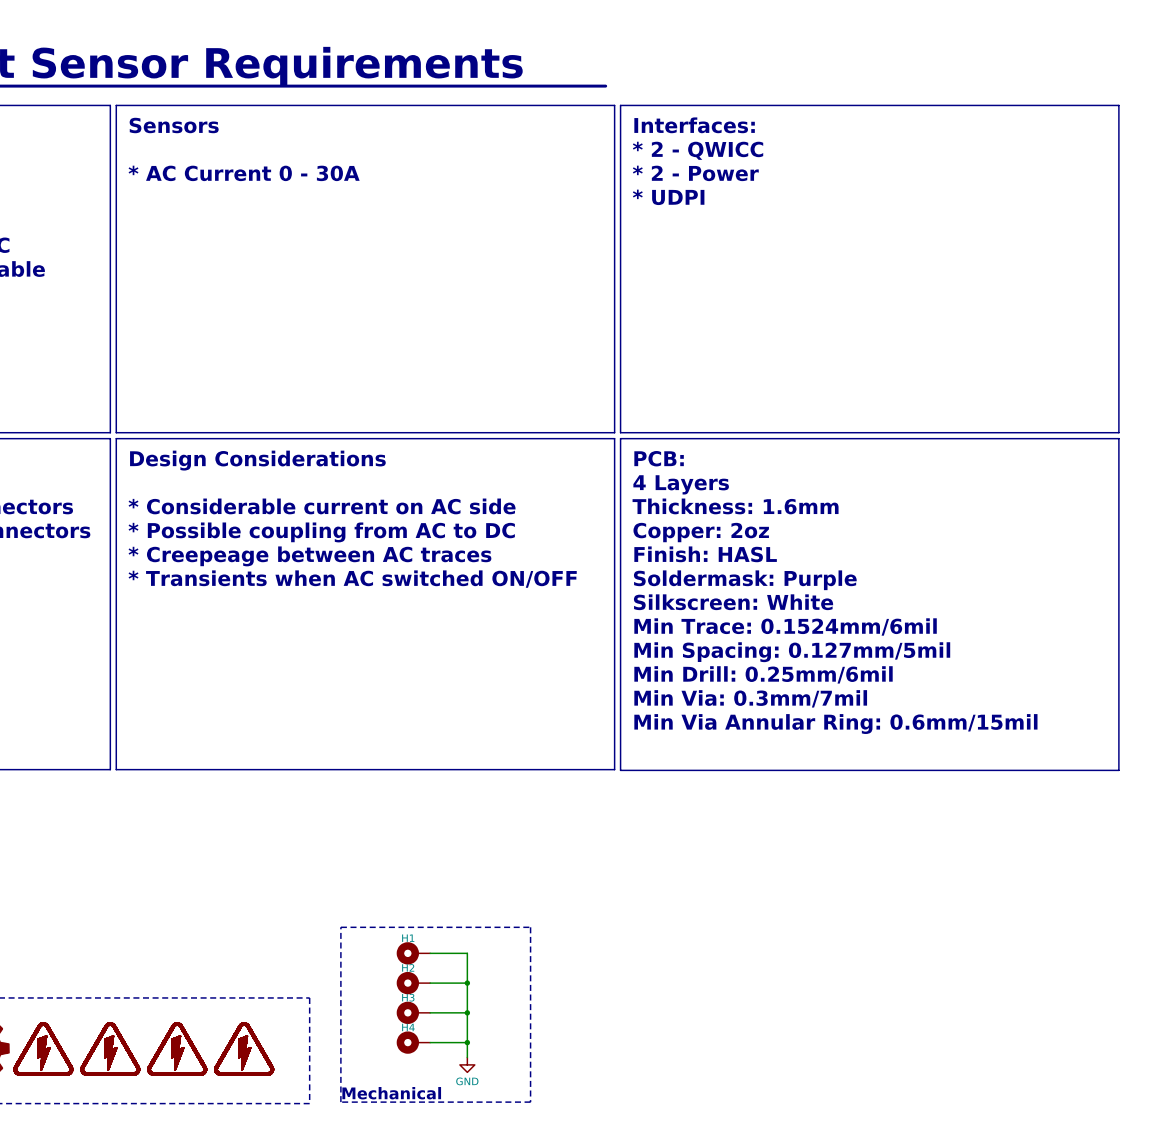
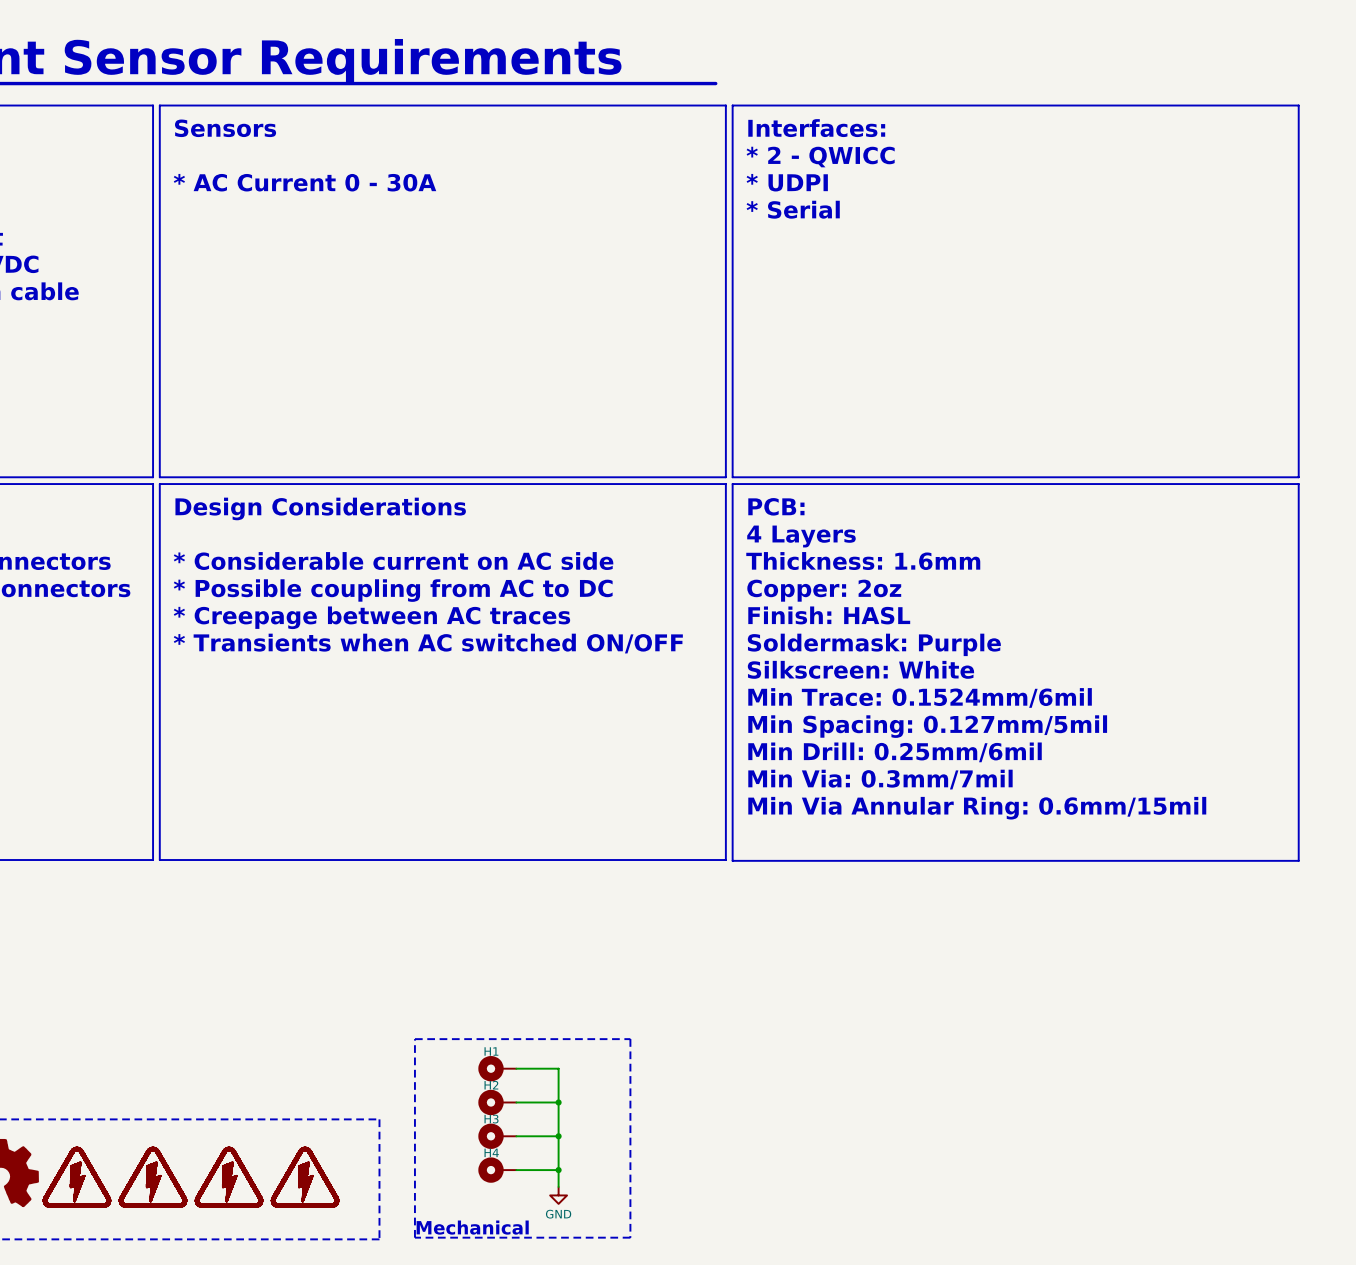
text: * 2 - Power (695, 173) -> * UDPI (787, 182)
text: * UDPI (668, 197) -> * Serial (793, 209)
text: * Creepeage between AC traces (309, 556) -> * Creepage between AC traces (371, 617)

